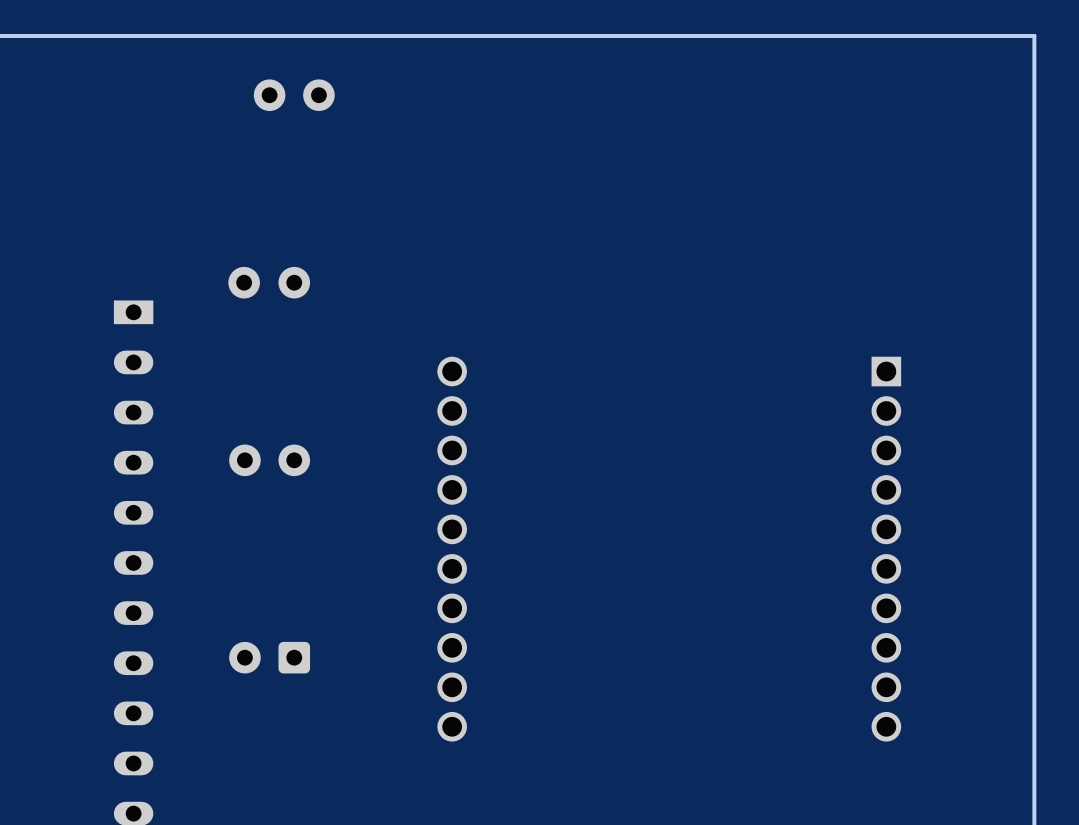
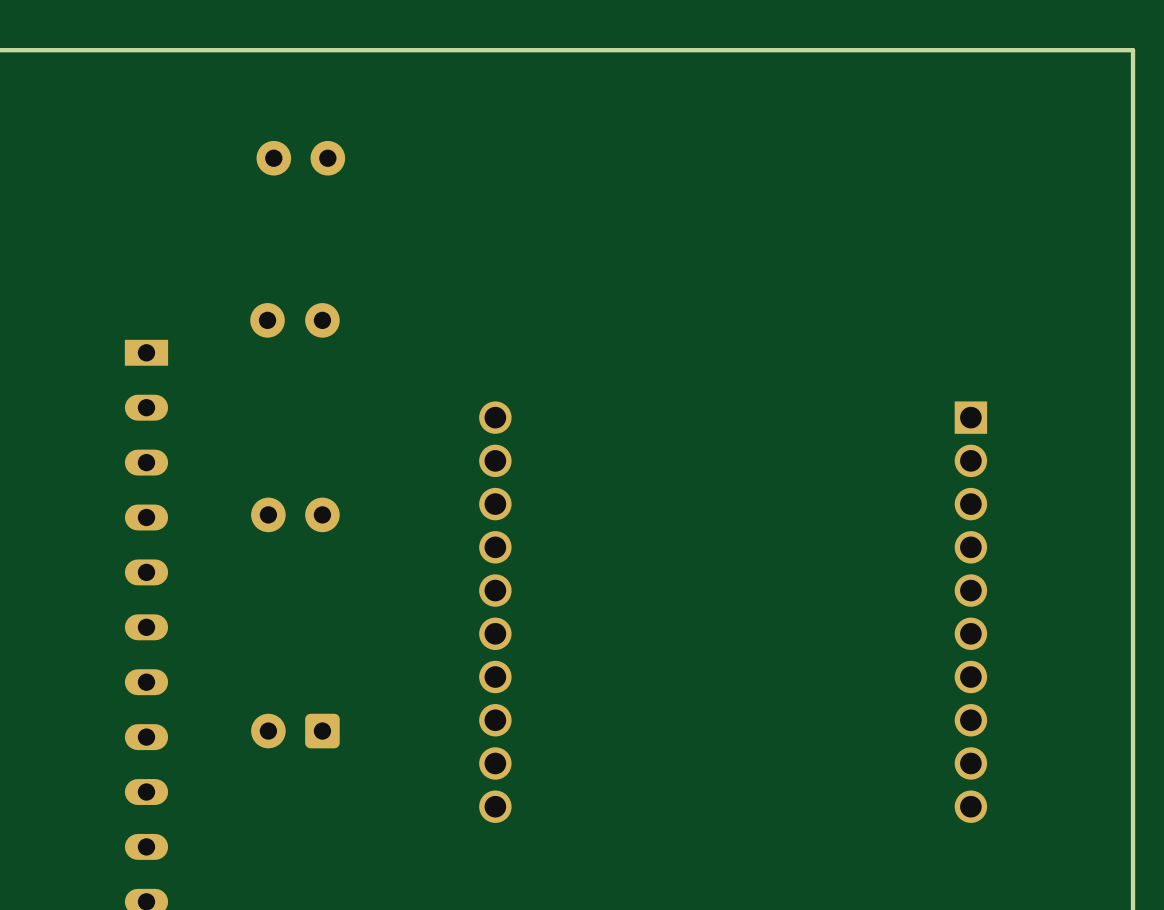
part position: (294, 95) -> (300, 158)

